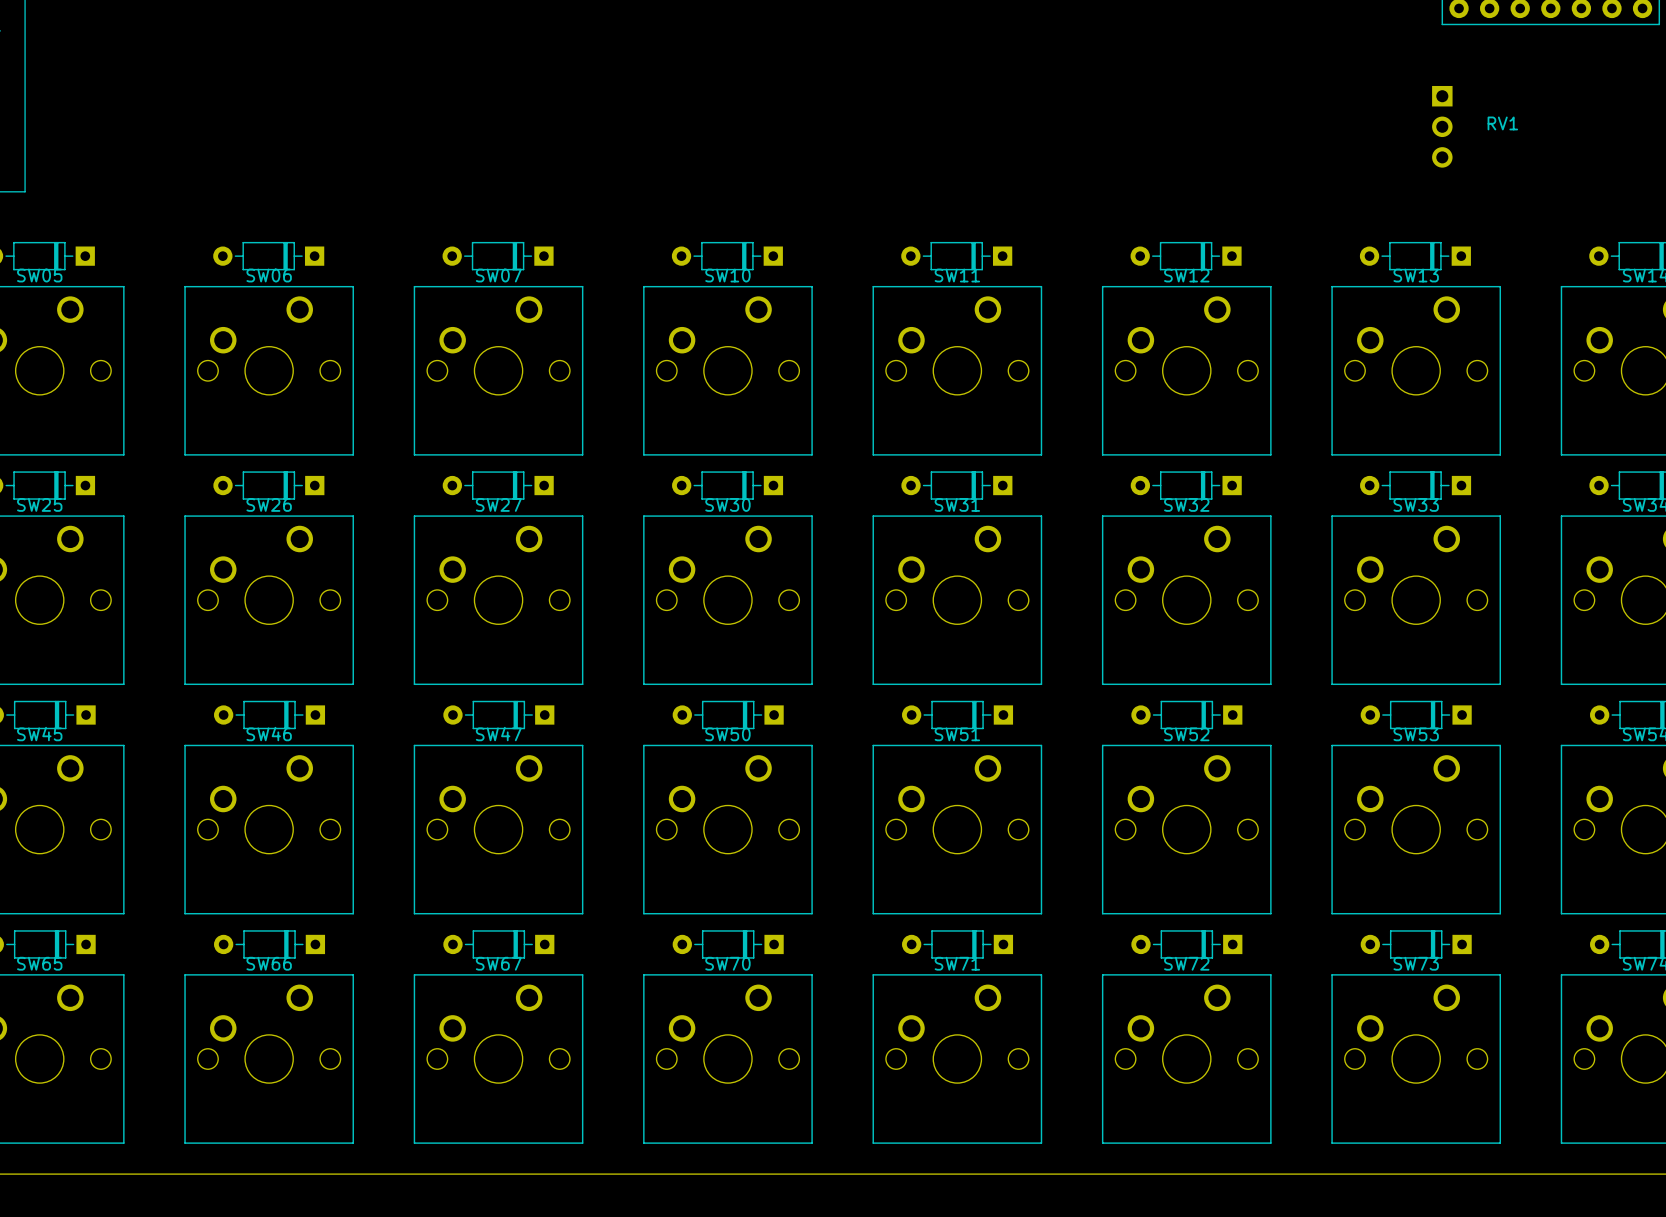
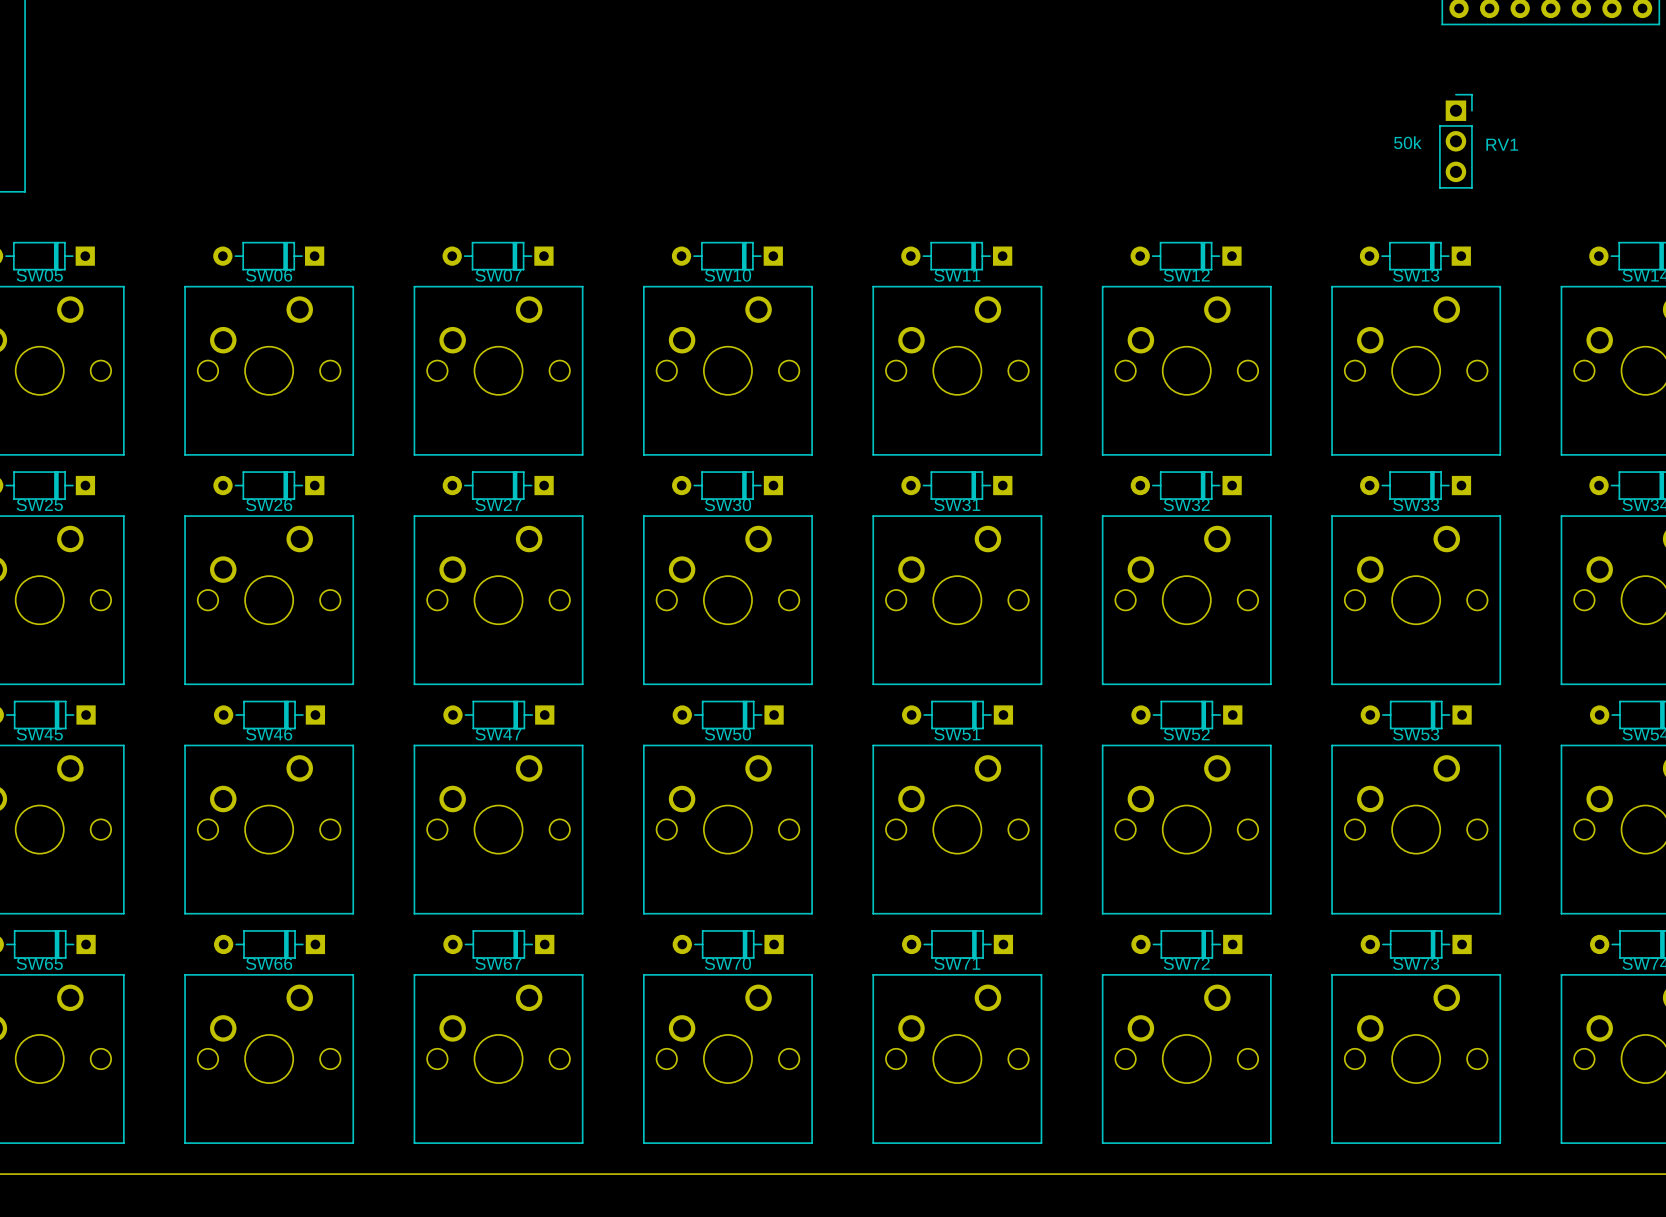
RV1 footprint: [1432, 85, 1453, 168] -> [1439, 93, 1473, 189]
RV1 value: none -> 50k (1407, 142)

